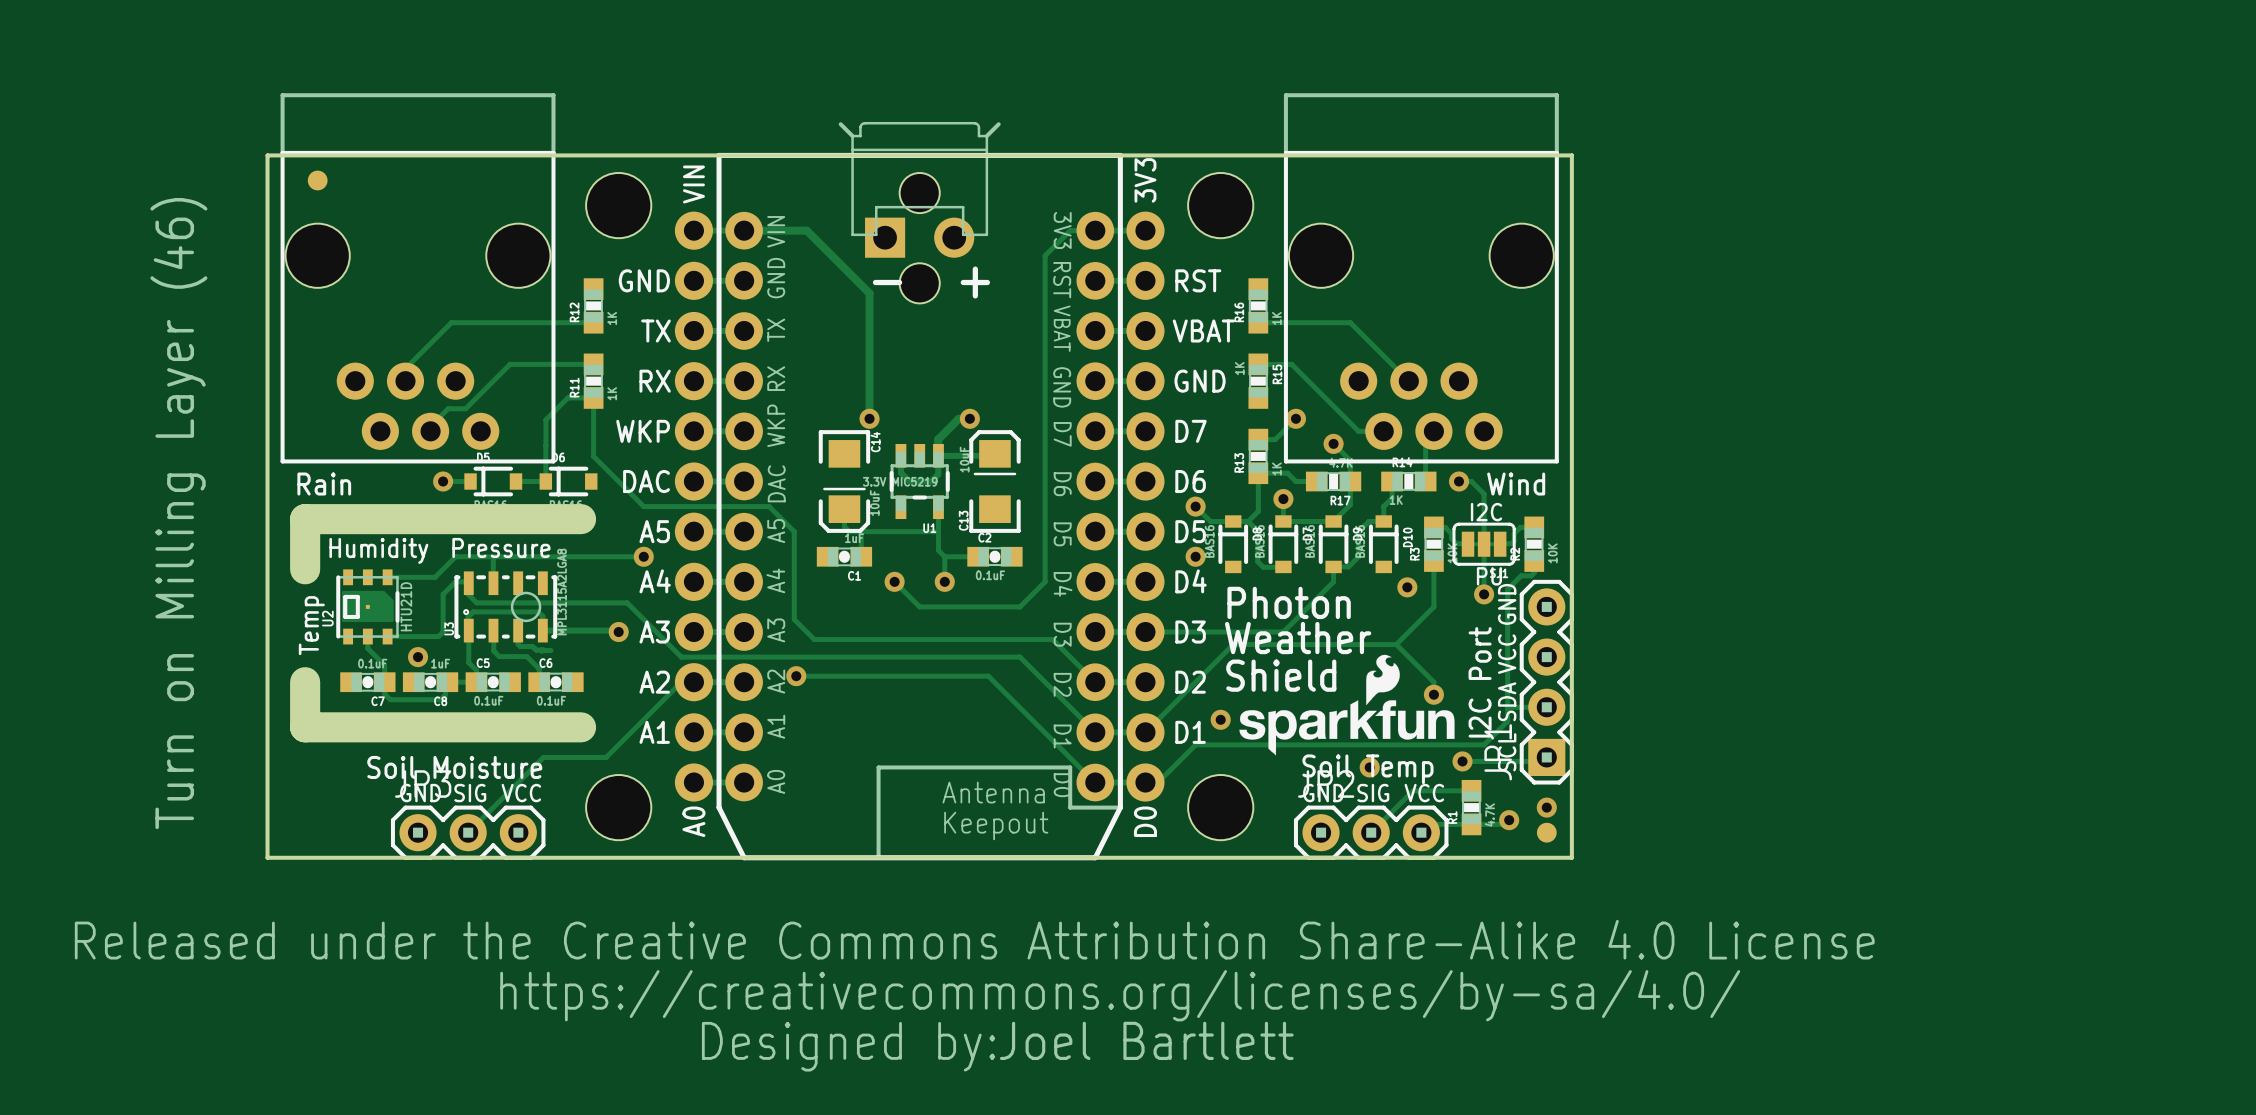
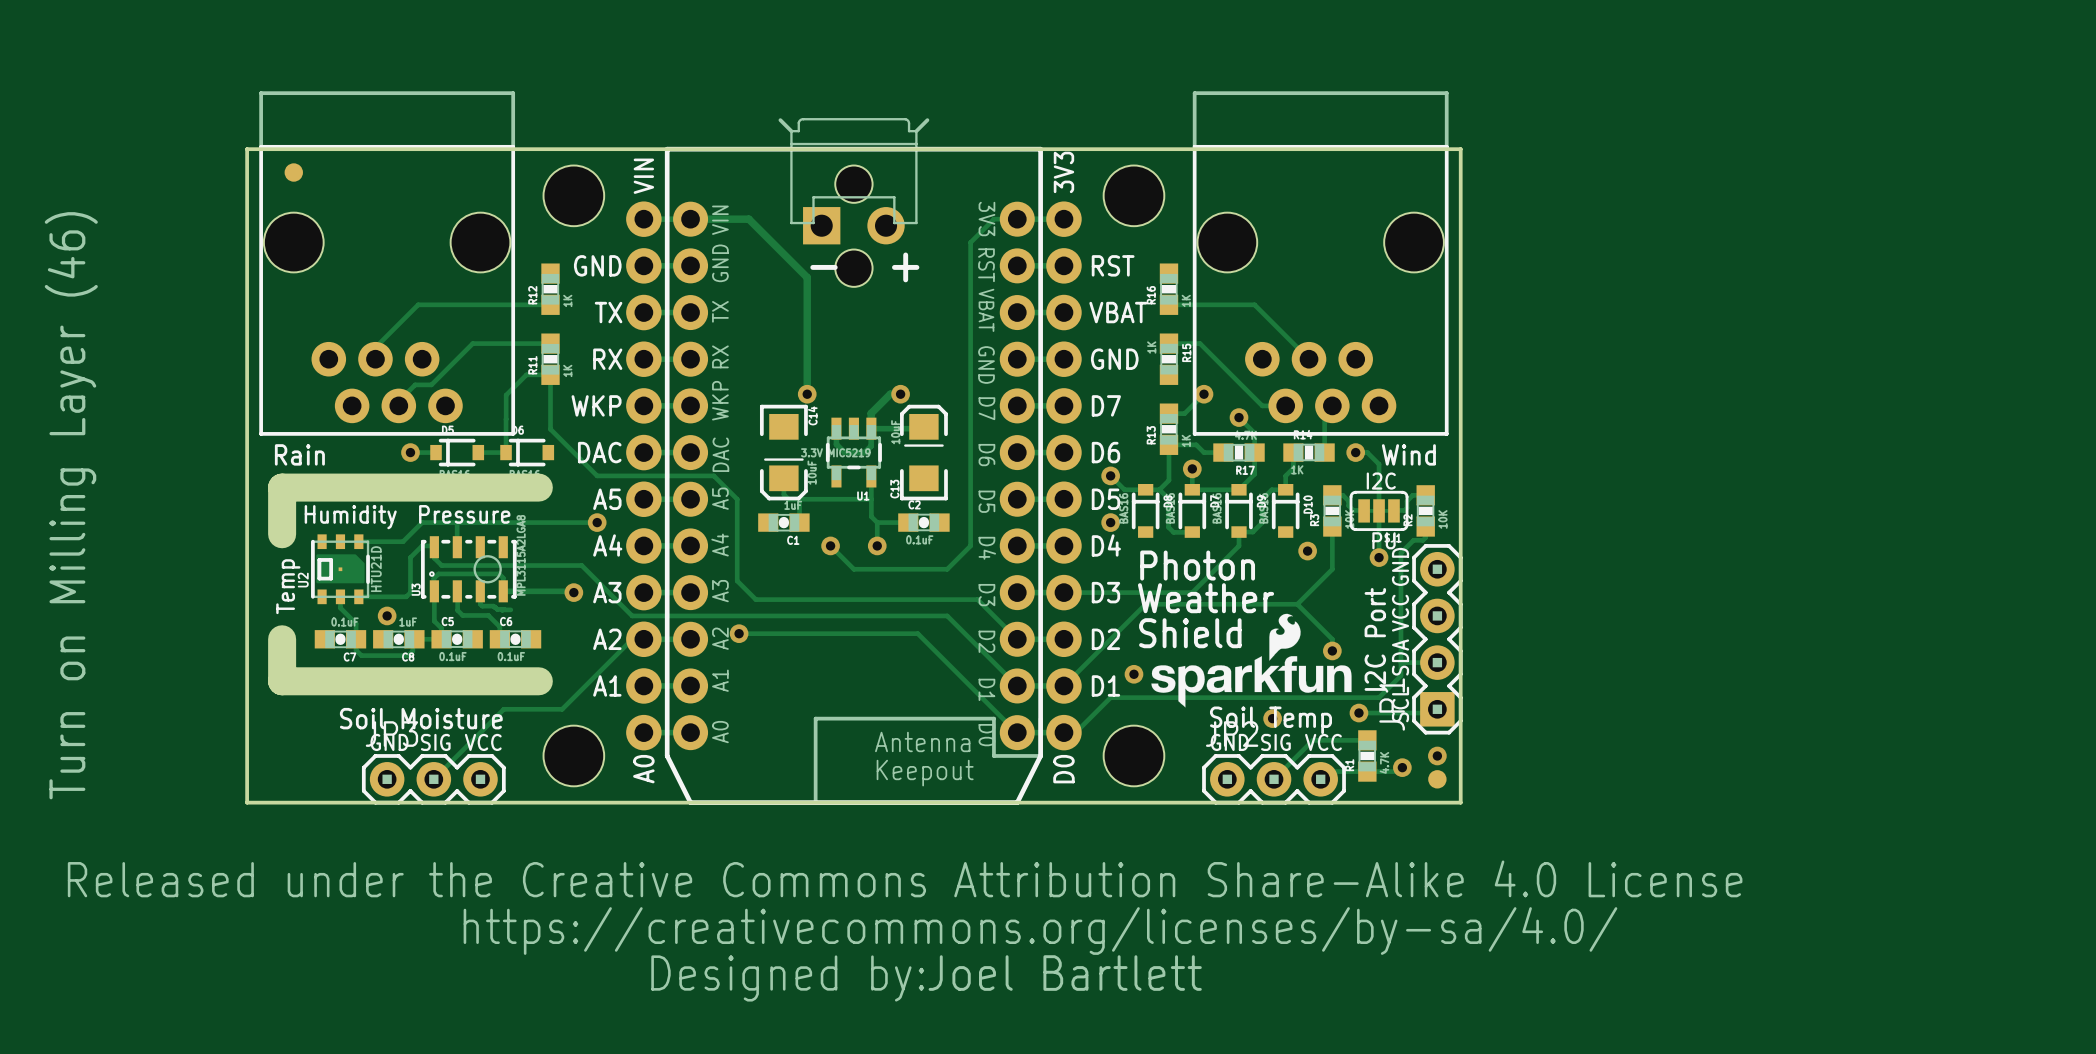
text position: Turn on Milling Layer (46) (178, 513) -> Turn on Milling Layer (46) (71, 505)

